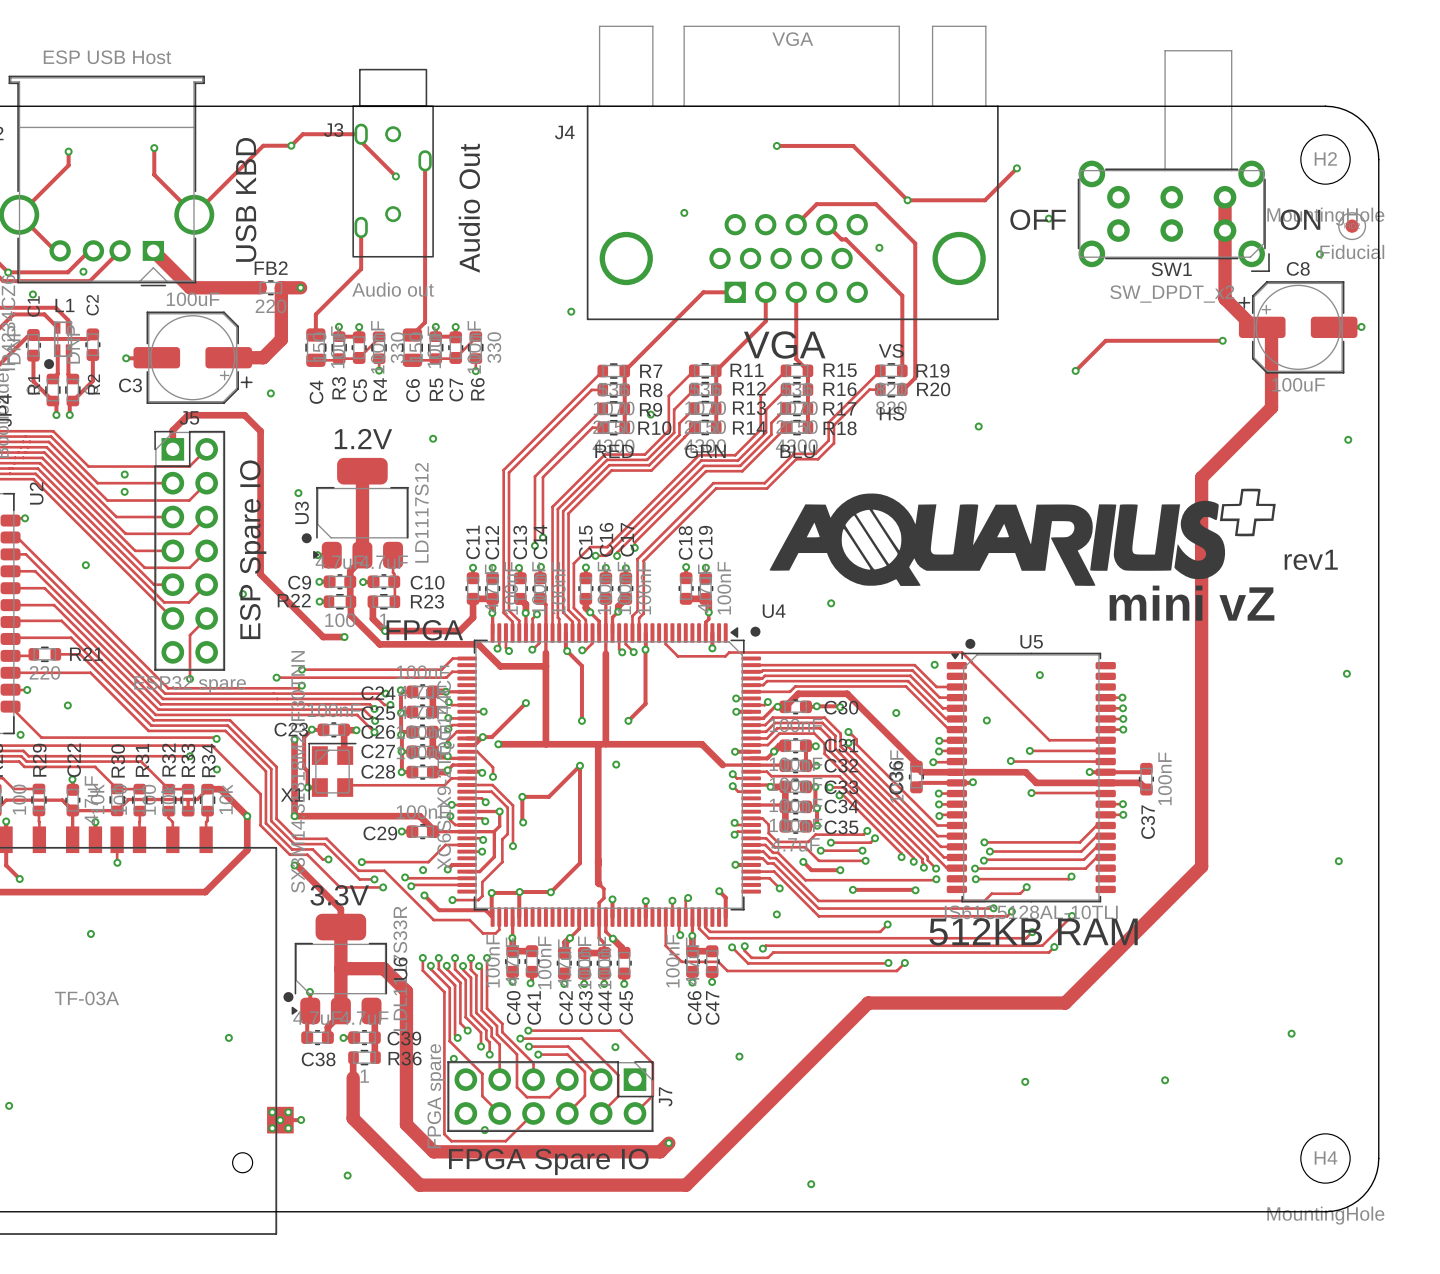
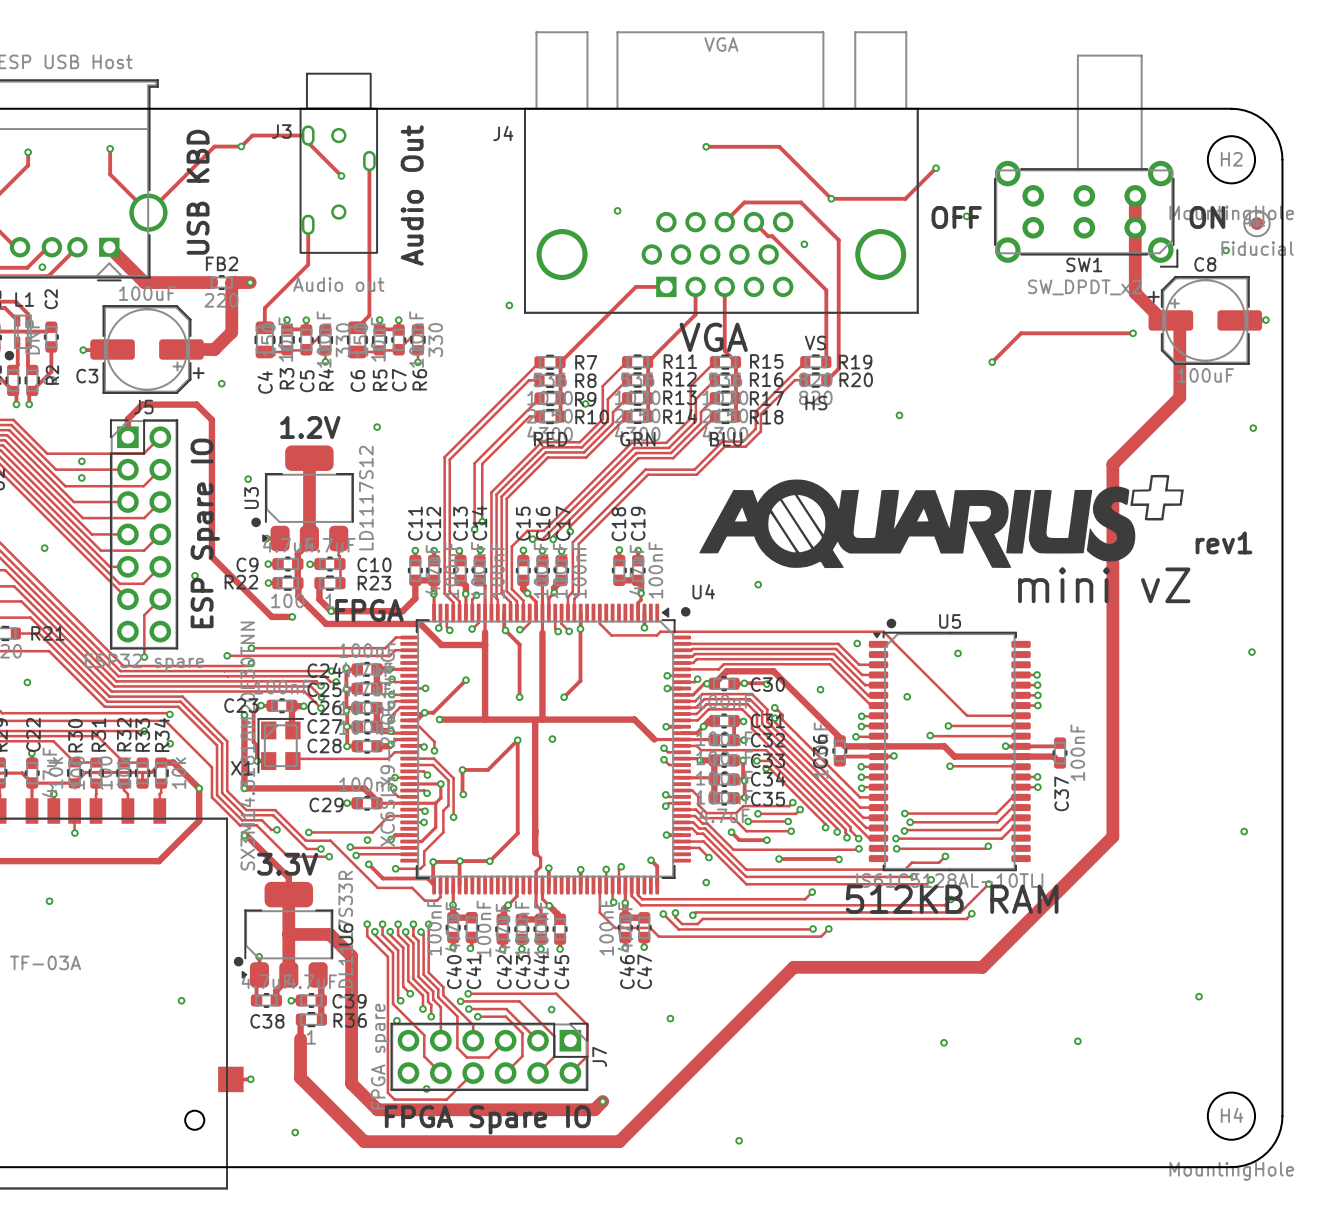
via: (272, 1112) -> none
via: (288, 1112) -> none
via: (280, 1120) -> none
via: (272, 1128) -> none
via: (288, 1128) -> none

